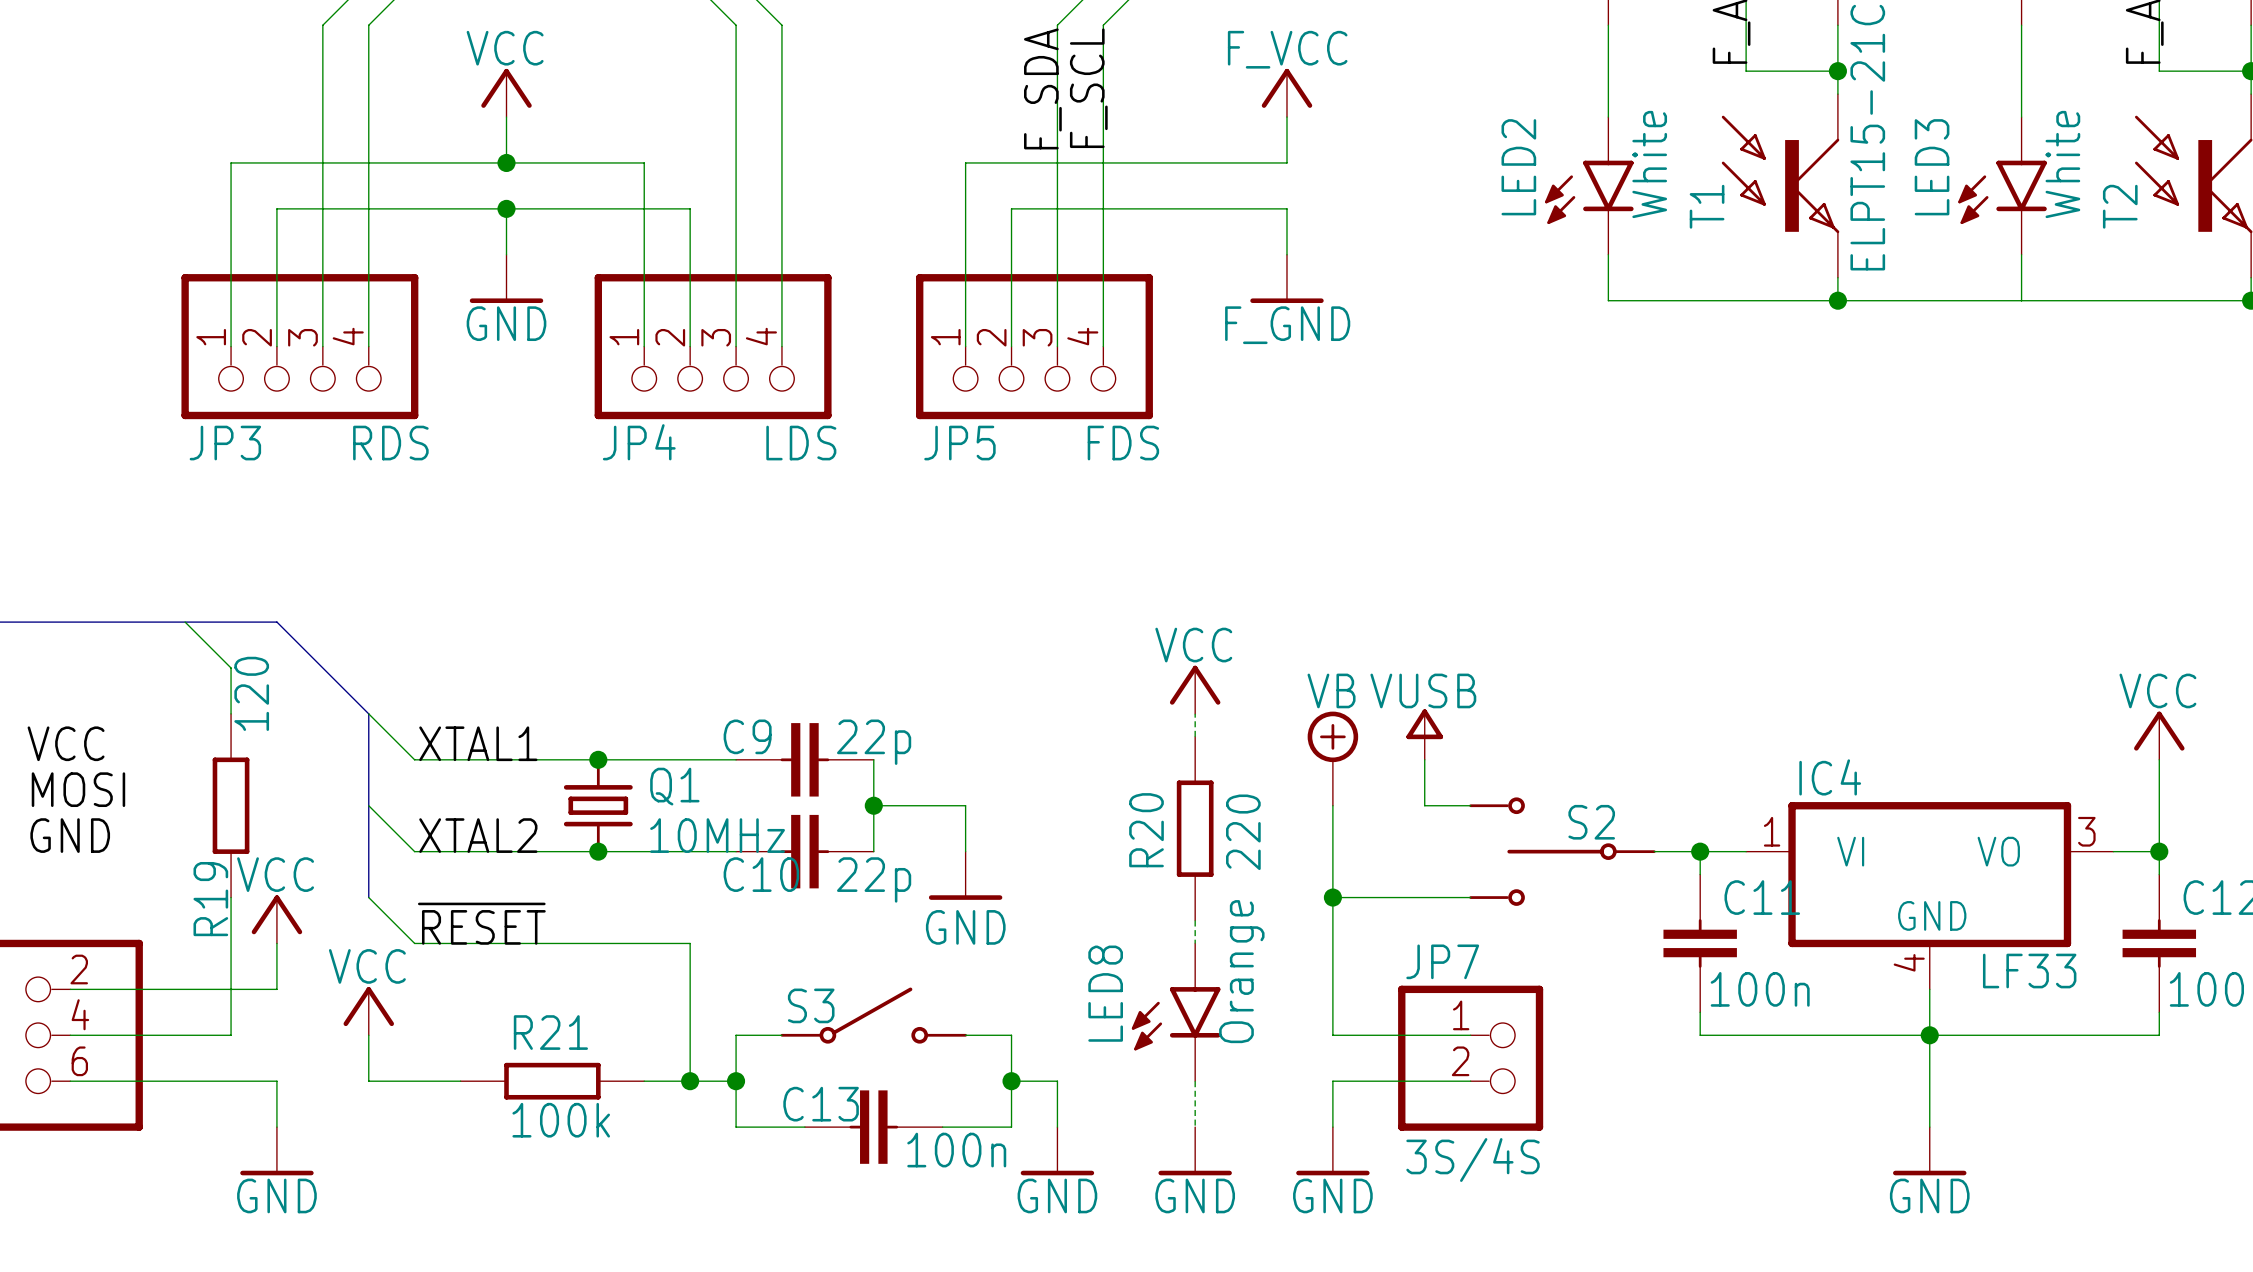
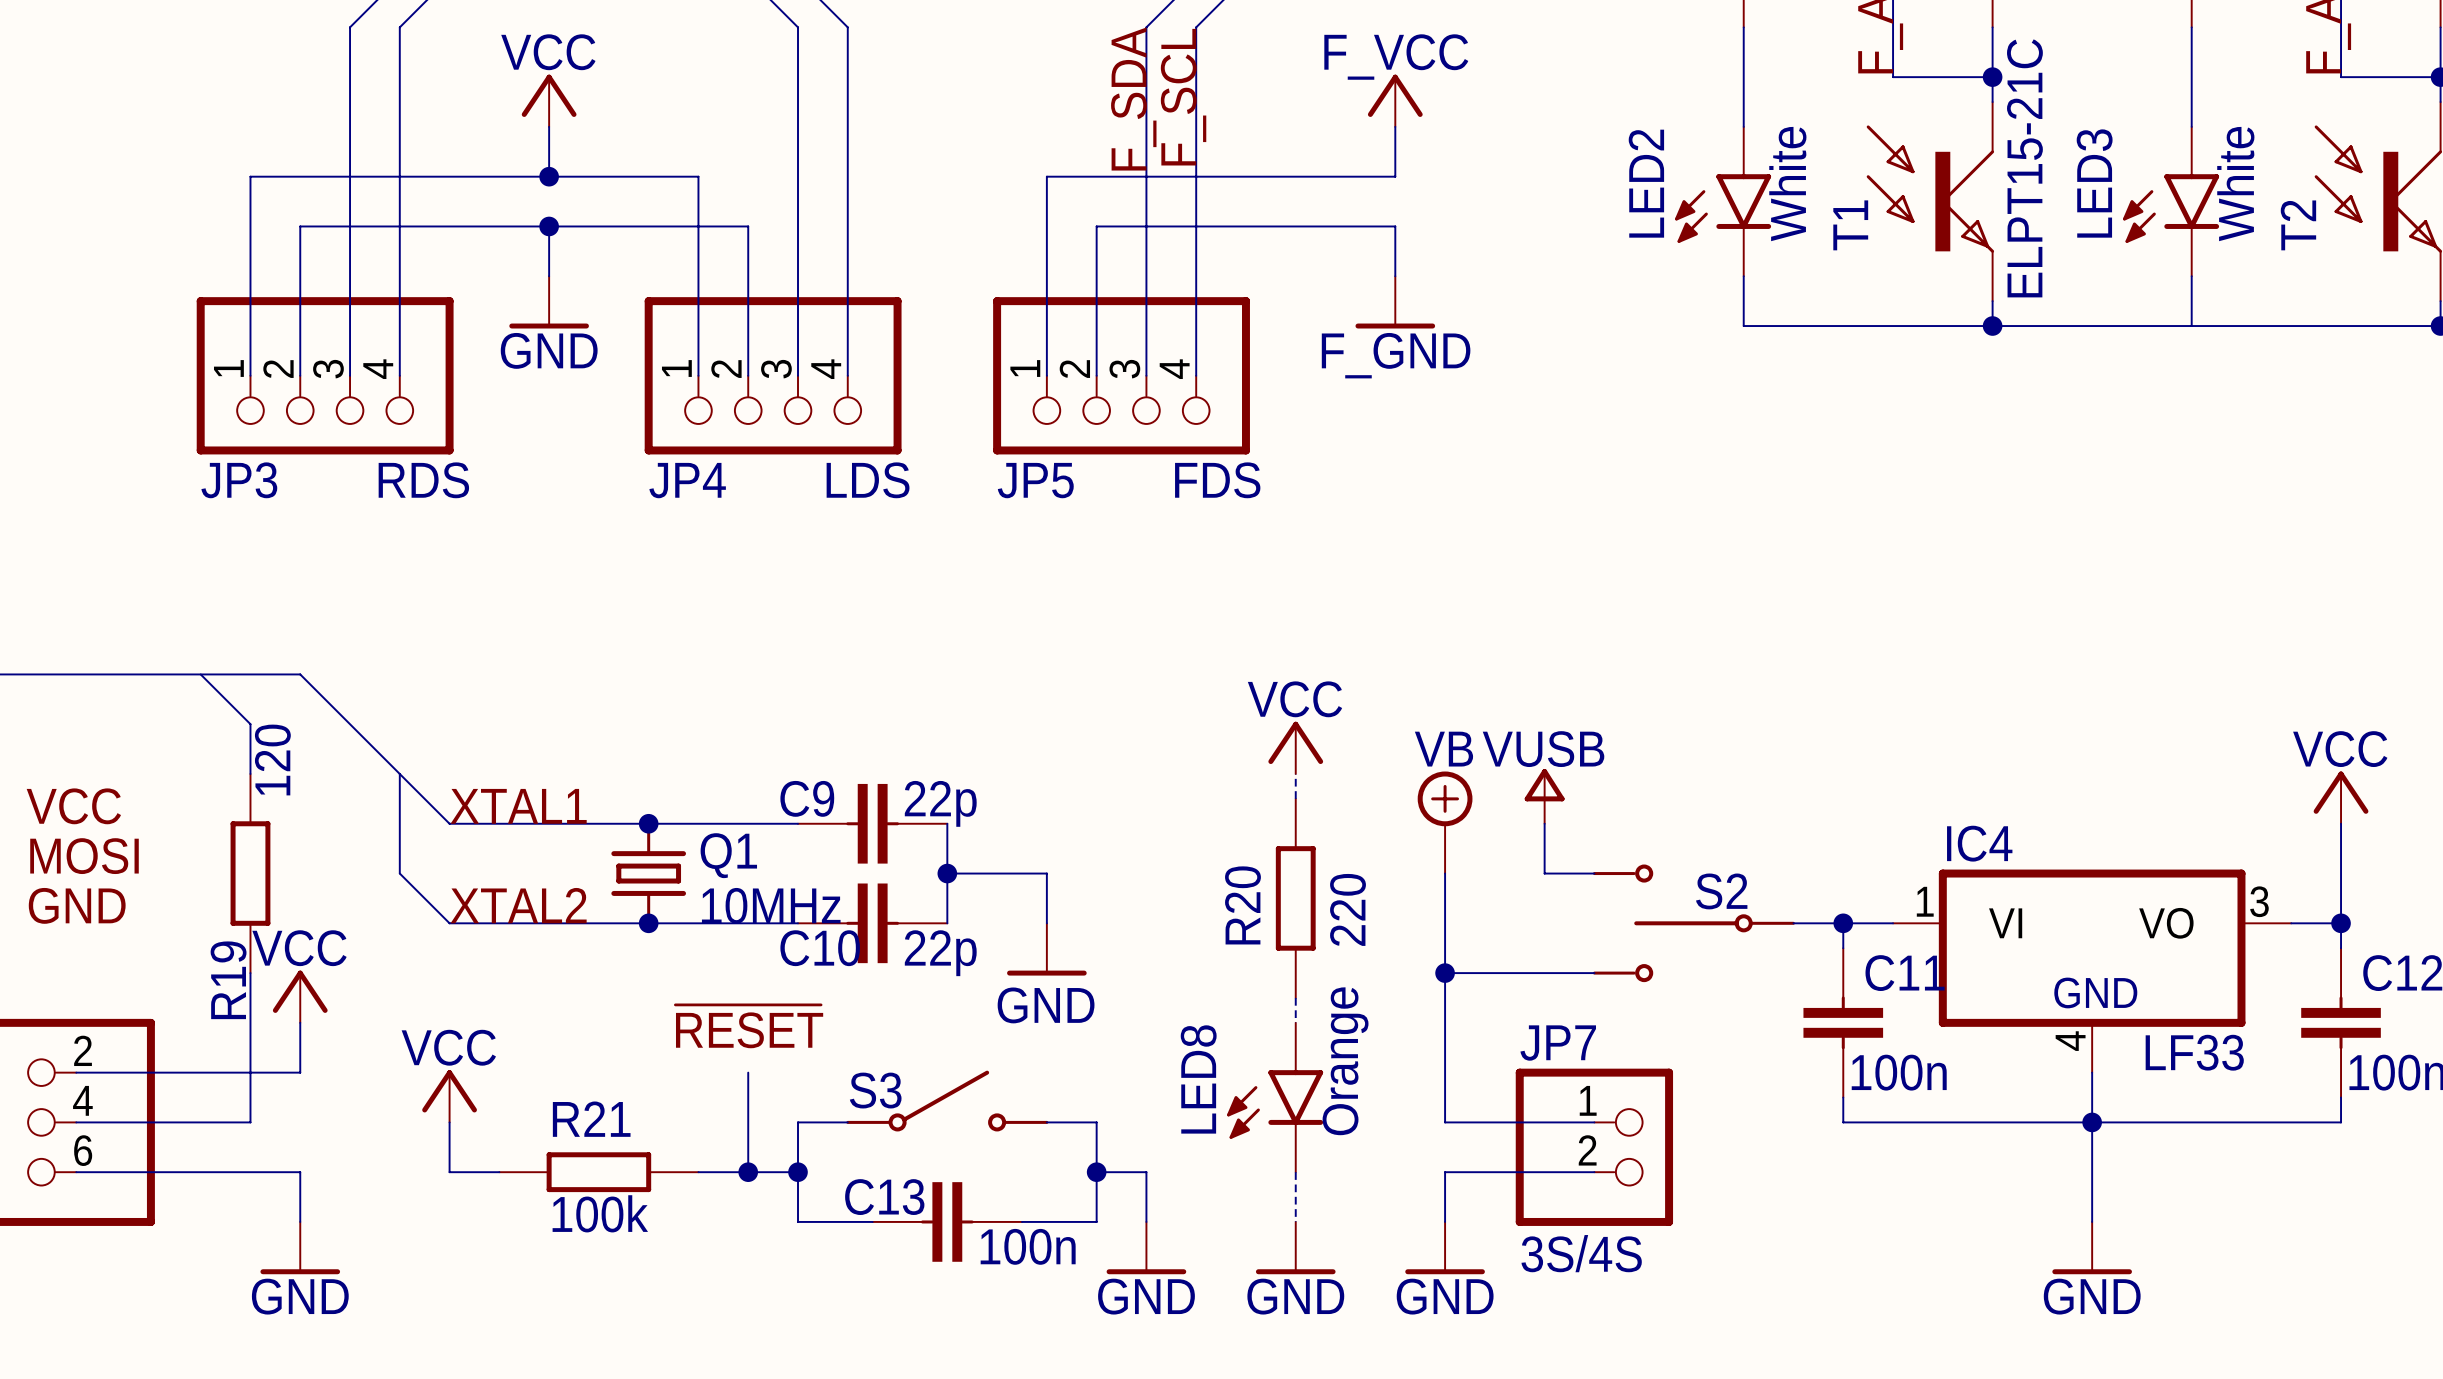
bus: (368, 805) (368, 897) -> none
wire: (368, 897) (414, 943) (690, 943) (690, 989) -> none
label position: ~{RESET} (481, 923) -> ~{RESET} (749, 1026)
power symbol position: VCC (368, 1011) -> VCC (449, 1096)
wire: (368, 1035) (368, 1081) (414, 1081) -> (449, 1122) (449, 1172)

